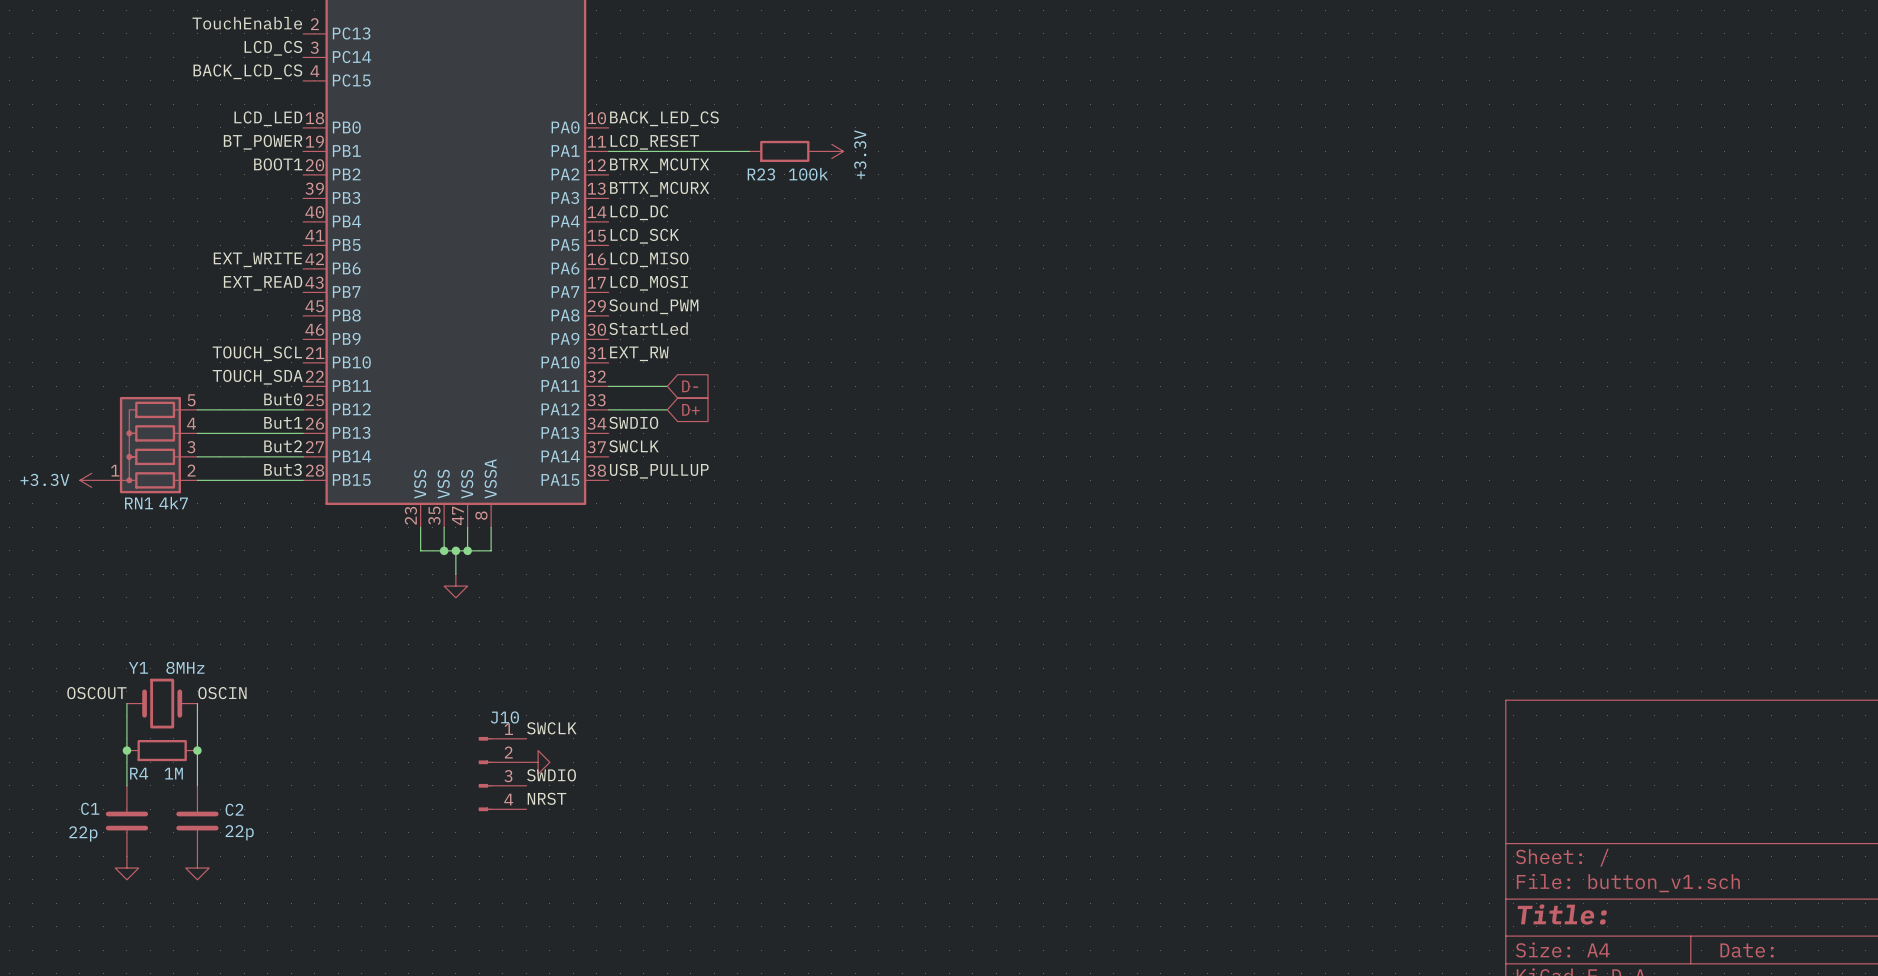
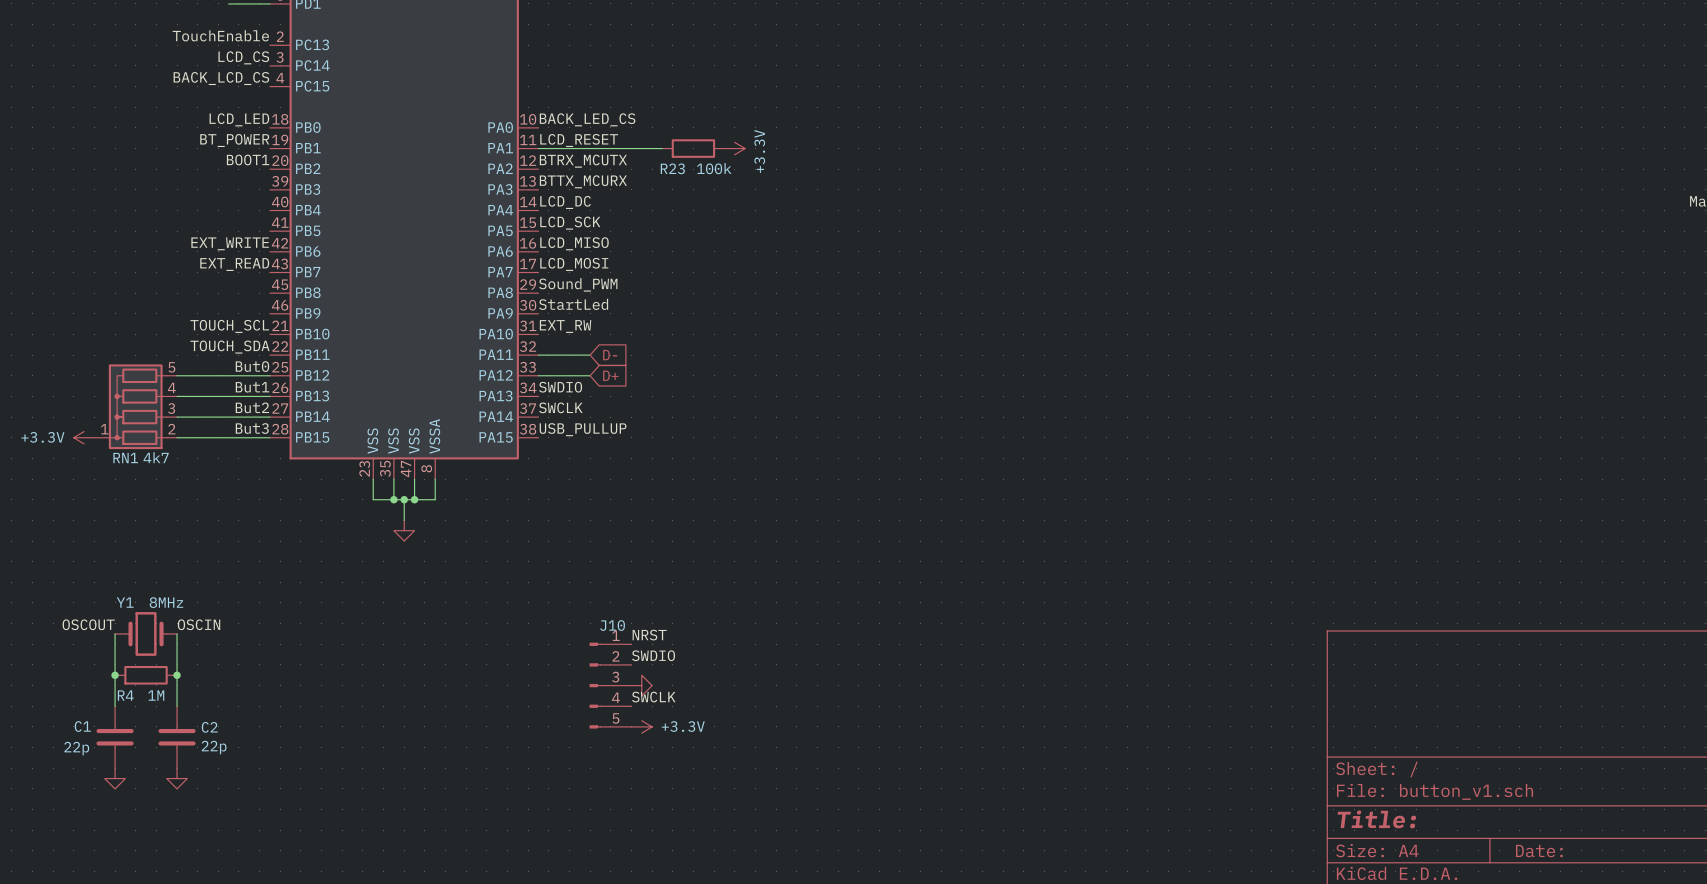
label position: SWCLK (551, 728) -> SWCLK (653, 697)
J10 symbol: [478, 736, 527, 812] -> [589, 642, 632, 729]
power symbol position: (538, 762) -> (641, 685)
label position: SWDIO (551, 775) -> SWDIO (653, 655)
label position: NRST (547, 798) -> NRST (649, 635)
power symbol: none -> +3.3V (641, 726)

